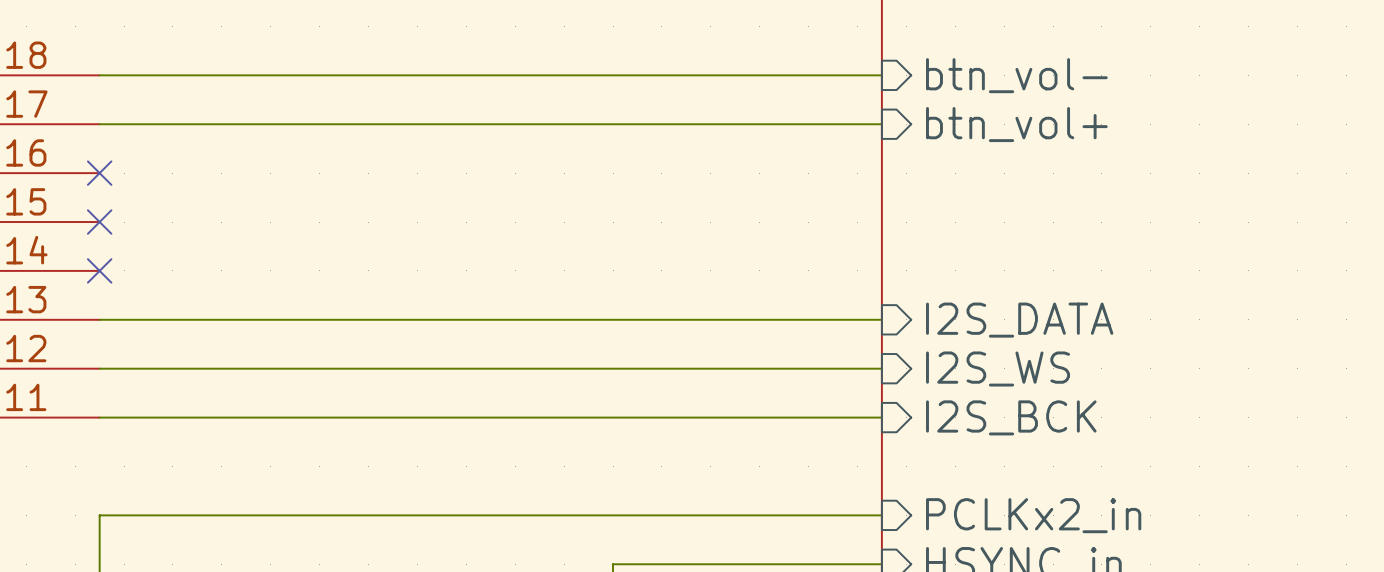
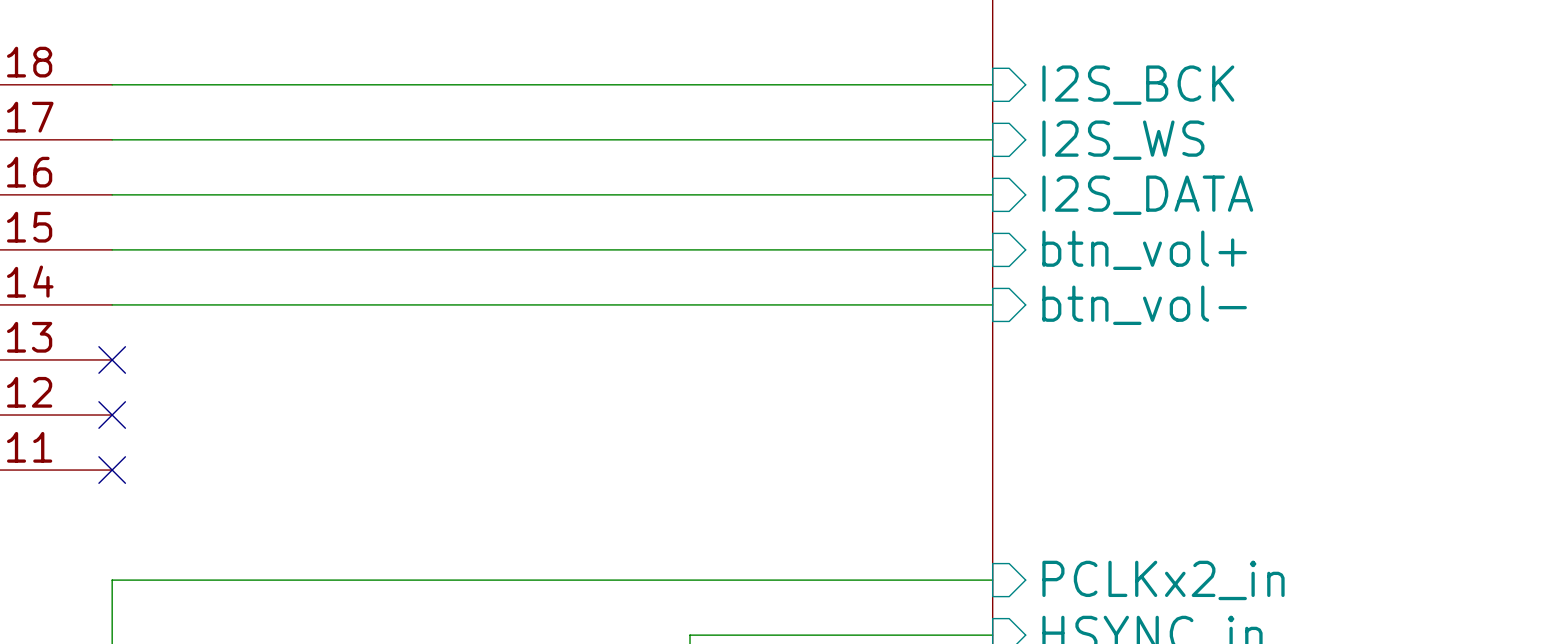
sheet pin: btn_vol- (1016, 75) -> I2S_BCK (1138, 85)
sheet pin: btn_vol+ (1016, 124) -> I2S_WS (1123, 140)
no-connect mark: (99, 173) -> none
no-connect mark: (99, 222) -> none
sheet pin: none -> btn_vol+ (1144, 250)
no-connect mark: (99, 270) -> none
sheet pin: none -> btn_vol- (1144, 305)
wire: (99, 319) (881, 319) -> (112, 194) (992, 194)
no-connect mark: none -> (112, 359)
sheet pin position: I2S_DATA (1019, 320) -> I2S_DATA (1147, 195)
wire: (99, 368) (881, 368) -> (112, 249) (992, 249)
no-connect mark: none -> (112, 415)
sheet pin: I2S_WS (998, 368) -> none
wire: (99, 417) (881, 417) -> (112, 304) (992, 304)
no-connect mark: none -> (112, 470)
sheet pin: I2S_BCK (1011, 417) -> none

